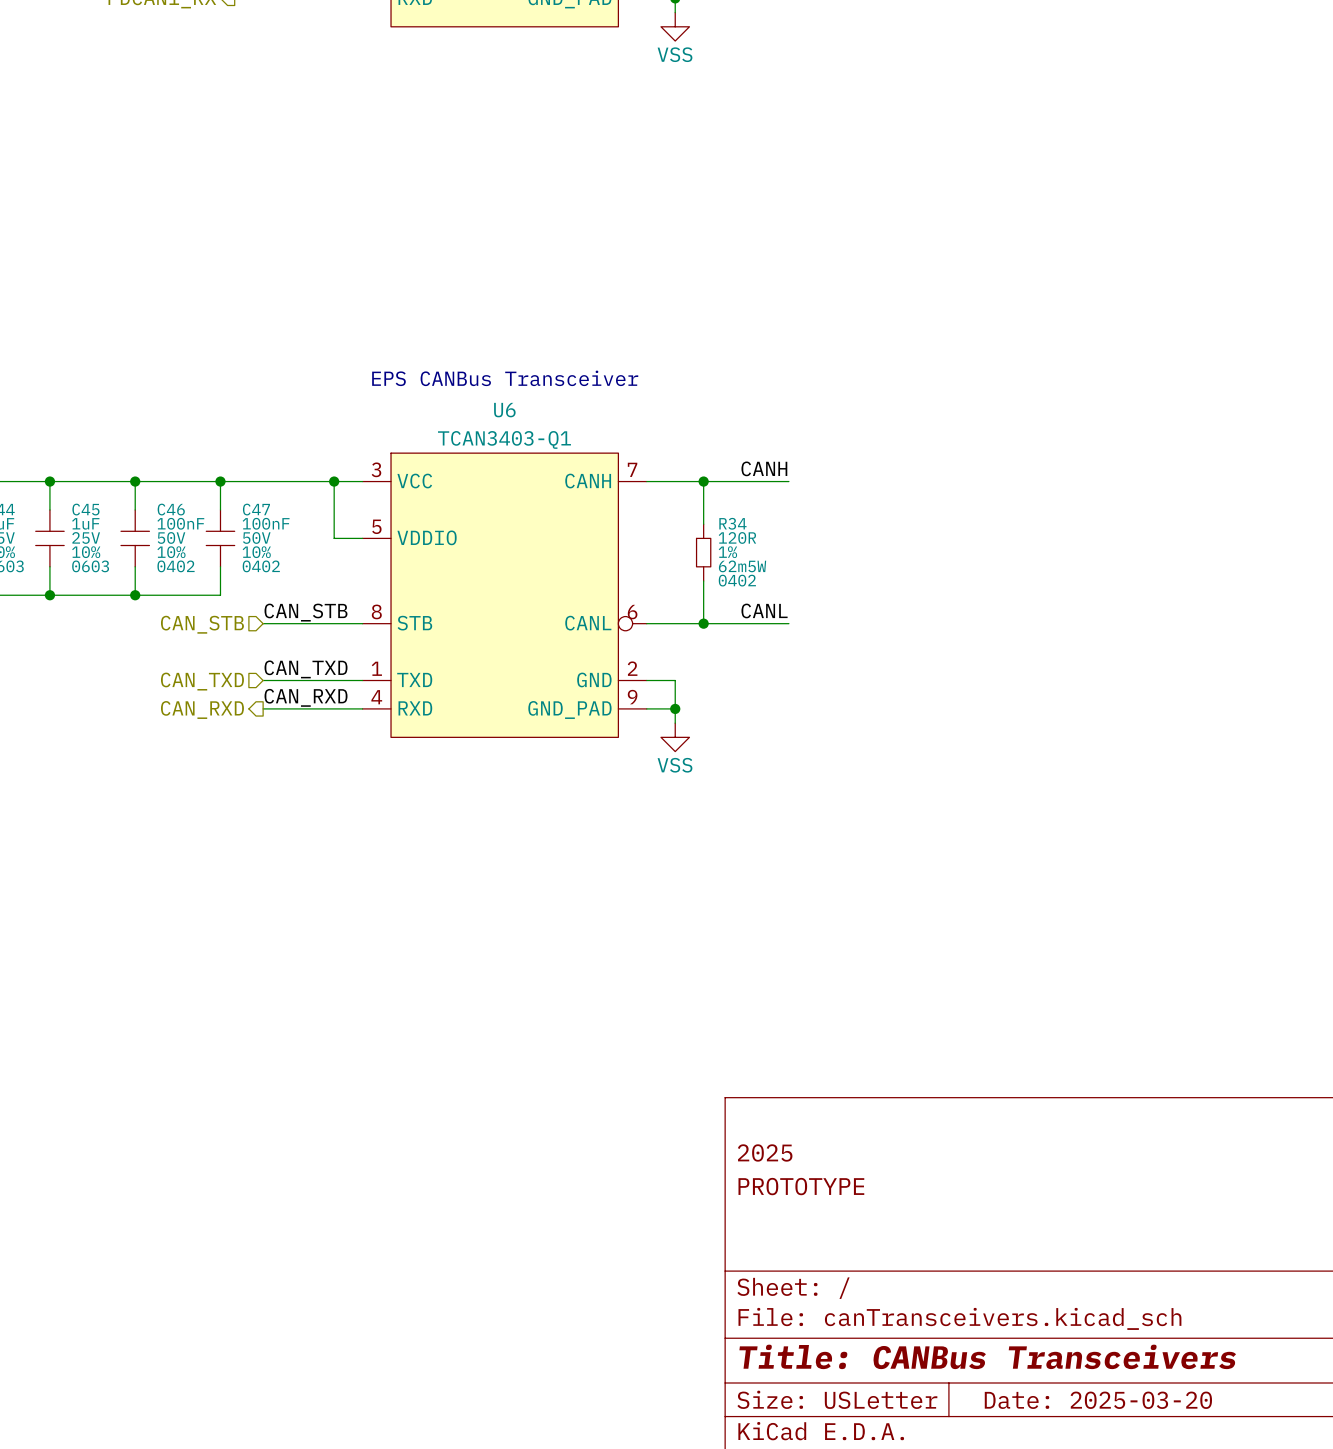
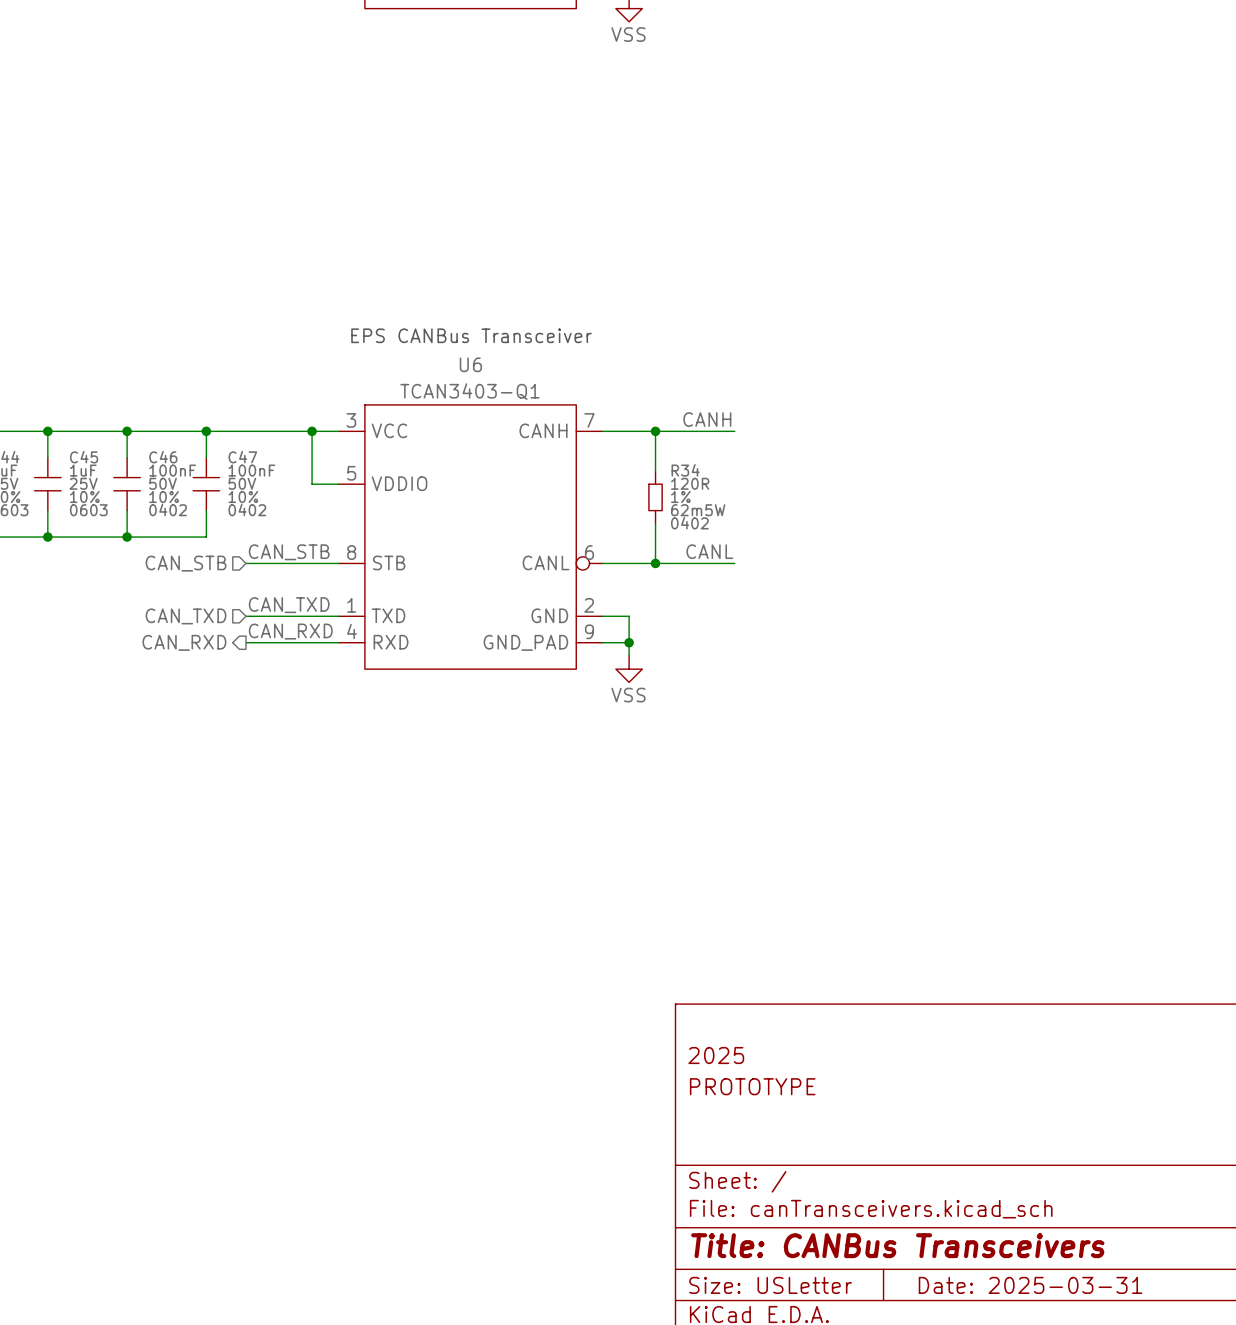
title block: Date: 2025-03-20 (1098, 1400) -> Date: 2025-03-31 (1030, 1285)

